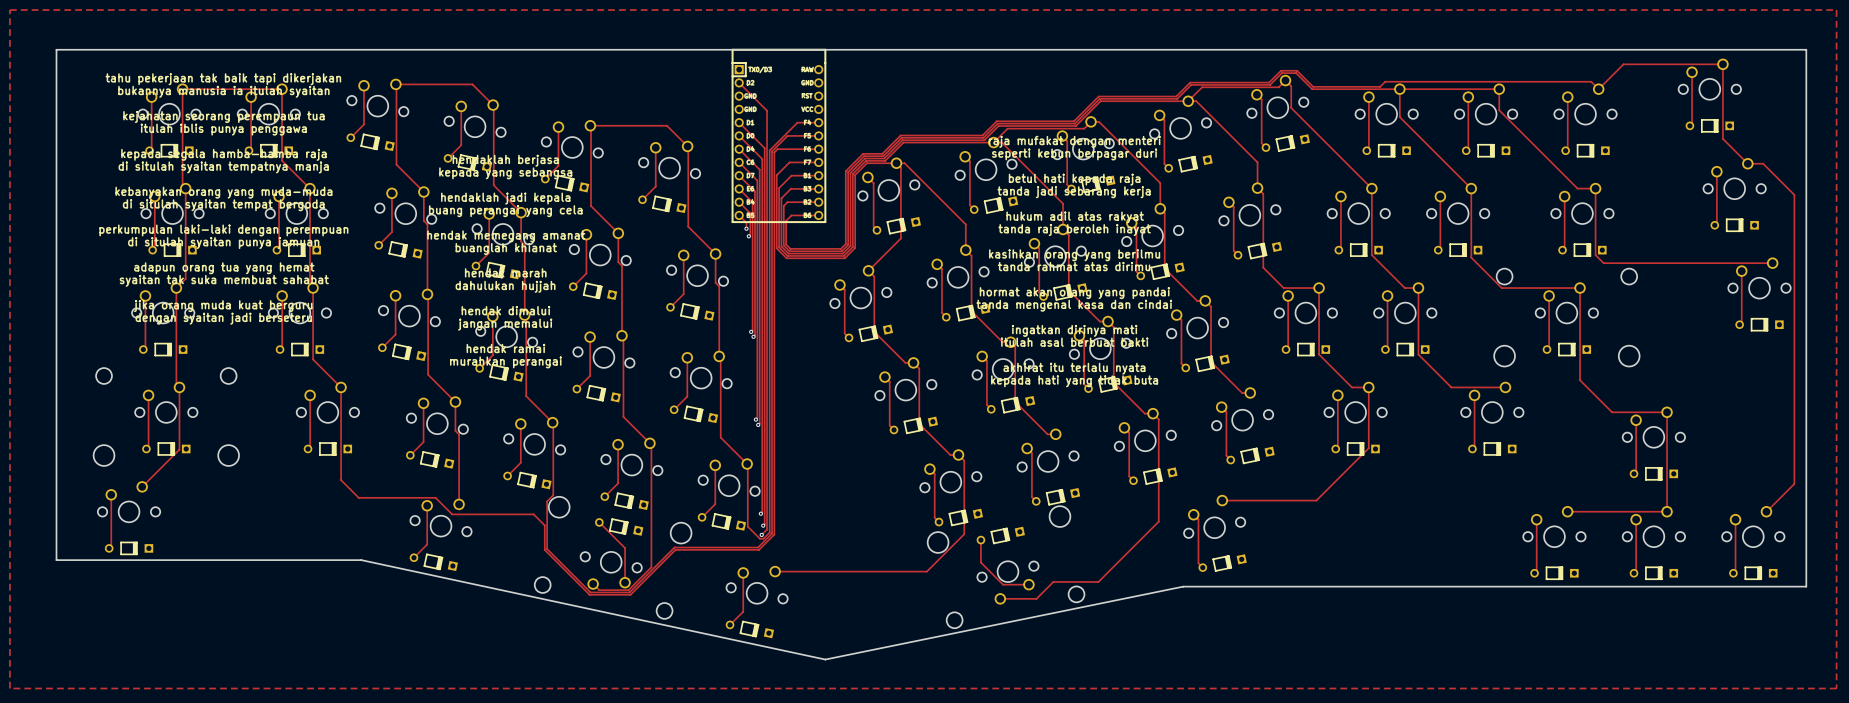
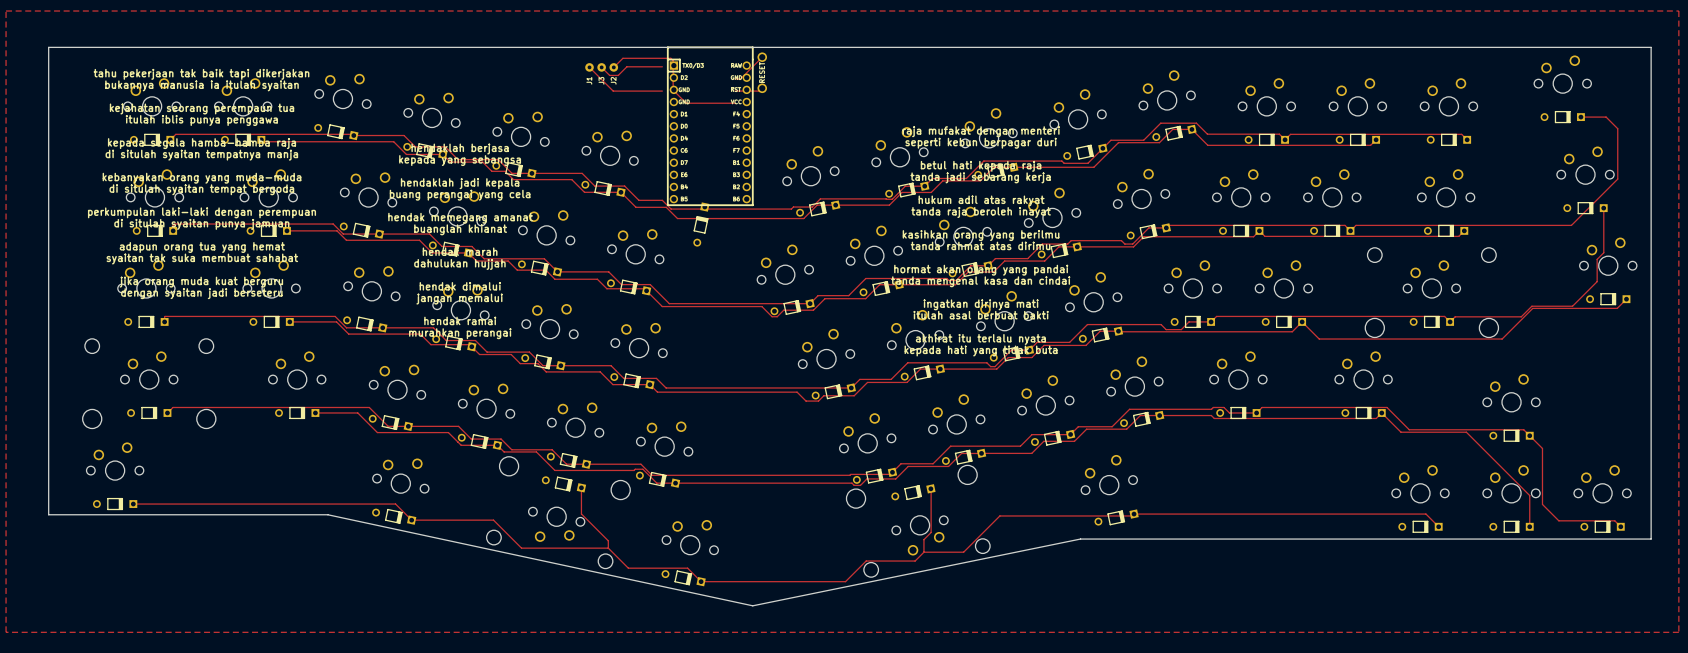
track: none -> (762, 57) (740, 78) (735, 78)
track: none -> (662, 66) (626, 66) (618, 75) (609, 75) (601, 67)
track: none -> (589, 67) (613, 91) (662, 91)
part: none -> (589, 67)
part: none -> (601, 67)
track: none -> (613, 67) (622, 58) (670, 58) (673, 60) (673, 90) (686, 103) (735, 103)
part: none -> (613, 67)
track: (1692, 72) (1692, 123) (1689, 125) -> none
part: none -> (762, 72)
track: (739, 82) (767, 110) (767, 529) (761, 535) -> none
track: (363, 85) (363, 124) (350, 137) -> none
track: (1399, 89) (1399, 117) (1471, 188) (1471, 257) (1501, 288) (1580, 288) (1580, 380) (1612, 412) (1667, 412) (1667, 511) (1567, 511) -> none
track: none -> (762, 88) (759, 91) (735, 91)
track: (1256, 94) (1261, 99) (1261, 143) (1265, 147) -> none
track: (151, 97) (151, 148) (149, 150) -> none
track: (251, 97) (251, 148) (248, 150) -> none
track: (1368, 97) (1368, 148) (1366, 150) -> none
track: (1468, 97) (1468, 148) (1466, 150) -> none
track: (1567, 97) (1567, 148) (1565, 150) -> none
track: (1188, 101) (1202, 87) (1278, 87) (1285, 80) (1291, 86) (1291, 107) (1371, 188) (1371, 255) (1404, 288) (1418, 288) (1418, 354) (1451, 387) (1505, 387) -> none
track: (461, 106) (461, 145) (448, 158) -> none
track: (1159, 115) (1164, 120) (1164, 163) (1168, 168) -> none
track: (739, 122) (764, 148) (763, 525) -> none
track: (818, 122) (797, 122) (769, 150) (769, 532) (763, 538) (759, 538) (747, 526) (747, 464) (720, 437) (719, 286) (715, 282) (715, 254) (688, 226) (688, 147) (666, 125) (590, 125) (590, 205) (618, 233) (618, 262) (621, 265) (623, 416) (651, 444) (651, 567) (628, 590) (599, 590) (593, 584) -> none
track: none -> (1580, 117) (1606, 117) (1617, 128) (1617, 179) (1571, 225) (1355, 225) (1350, 230) (1344, 225) (1168, 225) (1166, 227) (1148, 227) (1132, 244) (1124, 244) (1121, 240) (1071, 240) (1067, 244) (1042, 244) (1027, 258) (995, 258) (988, 265) (970, 265) (956, 280) (948, 280) (946, 278) (865, 278) (848, 295) (818, 295) (810, 303) (669, 303) (650, 284) (621, 284) (608, 271) (557, 271) (544, 258) (484, 258) (471, 246) (442, 246) (429, 234) (343, 234) (333, 224) (174, 224) (173, 230)
track: (558, 127) (558, 165) (545, 179) -> none
track: (739, 135) (762, 158) (760, 513) -> none
track: (818, 135) (787, 135) (772, 151) (772, 533) (758, 547) (674, 547) (629, 592) (590, 592) (547, 549) (547, 501) (553, 495) (553, 423) (526, 396) (524, 245) (521, 241) (521, 212) (493, 185) (493, 105) (472, 84) (395, 84) (396, 164) (423, 191) (423, 220) (427, 224) (428, 374) (455, 402) (455, 430) (459, 434) (459, 504) -> none
track: (1062, 136) (1067, 140) (1067, 184) (1071, 188) -> none
track: (993, 142) (1007, 128) (1084, 128) (1091, 121) (1099, 121) (1160, 183) (1160, 208) (1164, 213) (1164, 268) (1197, 300) (1205, 300) (1211, 306) (1211, 361) (1242, 392) (1250, 392) -> none
track: (655, 147) (655, 186) (642, 199) -> none
track: (739, 149) (759, 169) (758, 424) -> none
track: (818, 149) (777, 149) (774, 152) (774, 534) (759, 549) (675, 549) (630, 594) (589, 594) (544, 549) (544, 525) (533, 514) (452, 514) (435, 497) (358, 497) (341, 480) (341, 387) (313, 359) (313, 288) (309, 284) (309, 188) (282, 160) (282, 89) (182, 89) (182, 185) (185, 188) (185, 278) (176, 288) (176, 384) (179, 387) (179, 449) (142, 486) -> none
track: none -> (170, 139) (175, 134) (404, 135) (415, 146) (445, 146) (458, 159) (498, 159) (512, 173) (582, 173) (594, 186) (624, 186) (638, 200) (662, 200) (671, 209) (702, 209) (704, 207) (706, 209) (791, 209) (793, 207) (812, 207) (820, 198) (892, 199) (905, 186) (924, 186) (932, 178) (966, 178) (983, 161) (1061, 161) (1064, 163) (1087, 163) (1110, 140) (1143, 140) (1160, 123) (1196, 123) (1207, 134) (1279, 134) (1285, 139) (1290, 134) (1461, 134) (1467, 139)
track: none -> (261, 139) (263, 141) (393, 141) (406, 154) (442, 154) (450, 162) (482, 162) (491, 171) (505, 171) (513, 179) (571, 179) (584, 192) (620, 192) (636, 207) (666, 207) (677, 218) (803, 218) (817, 205) (889, 205) (902, 192) (931, 192) (942, 180) (980, 180) (993, 167) (1093, 167) (1118, 142) (1159, 142) (1172, 129) (1191, 129) (1207, 145) (1370, 145) (1376, 139)
track: (965, 156) (969, 161) (969, 205) (974, 209) -> none
track: (739, 162) (757, 180) (755, 419) -> none
track: (818, 162) (789, 162) (776, 175) (776, 248) (786, 258) (844, 258) (855, 247) (855, 175) (866, 163) (904, 163) (965, 224) (965, 250) (971, 255) (971, 311) (1002, 342) (1010, 342) (1015, 346) (1015, 401) (1047, 434) (1055, 434) -> none
track: (896, 163) (900, 167) (900, 238) (868, 270) (874, 276) (874, 331) (905, 362) (913, 362) (919, 368) (919, 423) (950, 454) (958, 454) (964, 460) (964, 534) (926, 571) (775, 571) -> none
track: (1716, 171) (1716, 223) (1714, 225) -> none
track: (739, 175) (754, 191) (753, 336) -> none
track: (818, 175) (791, 175) (779, 188) (779, 247) (787, 255) (843, 255) (852, 246) (852, 174) (866, 160) (885, 160) (903, 142) (1001, 142) (1063, 203) (1063, 229) (1068, 235) (1068, 290) (1099, 321) (1108, 321) (1113, 327) (1113, 382) (1144, 413) (1153, 413) (1158, 419) (1158, 521) (1098, 581) (1053, 581) (1036, 598) (1000, 598) -> none
track: (867, 177) (873, 183) (873, 226) (876, 230) -> none
track: (739, 188) (752, 202) (751, 331) -> none
track: (818, 188) (790, 188) (781, 198) (781, 246) (788, 253) (842, 253) (850, 246) (850, 173) (865, 158) (884, 158) (902, 140) (984, 140) (998, 125) (1075, 125) (1100, 101) (1196, 101) (1257, 162) (1257, 188) (1263, 193) (1263, 267) (1283, 288) (1319, 288) (1319, 354) (1352, 387) (1368, 387) (1368, 448) (1316, 500) (1222, 500) -> none
track: (391, 193) (391, 232) (378, 245) -> none
track: (154, 196) (154, 248) (152, 250) -> none
track: (279, 196) (279, 248) (276, 250) -> none
track: (1340, 196) (1340, 248) (1338, 250) -> none
track: (1440, 196) (1440, 248) (1438, 250) -> none
track: (1564, 196) (1564, 248) (1562, 250) -> none
track: (739, 202) (750, 213) (748, 236) -> none
track: (818, 202) (787, 202) (783, 206) (783, 245) (789, 251) (841, 251) (848, 245) (848, 172) (864, 156) (883, 156) (901, 137) (983, 137) (997, 123) (1074, 123) (1099, 98) (1177, 98) (1191, 84) (1270, 84) (1281, 73) (1296, 73) (1312, 89) (1499, 89) (1499, 110) (1577, 188) (1595, 188) (1595, 255) (1603, 263) (1772, 263) -> none
track: (1228, 202) (1233, 207) (1233, 250) (1238, 255) -> none
track: (489, 213) (489, 252) (475, 265) -> none
track: (739, 215) (746, 222) (746, 228) -> none
track: (818, 215) (791, 215) (786, 220) (786, 244) (790, 248) (840, 248) (845, 244) (845, 171) (863, 153) (882, 153) (900, 135) (982, 135) (996, 121) (1073, 121) (1098, 96) (1176, 96) (1190, 82) (1269, 82) (1280, 70) (1297, 70) (1313, 86) (1380, 86) (1385, 81) (1591, 81) (1598, 89) (1623, 64) (1722, 64) (1722, 138) (1747, 163) (1763, 163) (1794, 194) (1794, 483) (1766, 511) -> none
track: (1131, 223) (1136, 227) (1136, 271) (1140, 275) -> none
track: none -> (1603, 208) (1603, 252) (1597, 259) (1597, 281) (1572, 306) (1531, 306) (1521, 316) (1455, 316) (1450, 321) (1444, 316) (1216, 316) (1211, 321) (1189, 321) (1181, 329) (1166, 329) (1161, 324) (1087, 324) (1069, 342) (1037, 342) (1029, 350) (1011, 350) (994, 366) (990, 366) (986, 362) (907, 362) (891, 379) (859, 379) (851, 387) (666, 387) (656, 378) (623, 378) (611, 365) (543, 365) (529, 352) (487, 352) (475, 340) (446, 340) (433, 327) (346, 327) (335, 316) (164, 316) (164, 321)
via: (746, 228) -> none
track: (586, 234) (586, 273) (573, 286) -> none
via: (748, 236) -> none
part: none -> (701, 224)
track: (1034, 243) (1039, 248) (1039, 292) (1043, 296) -> none
track: none -> (286, 230) (337, 230) (346, 240) (419, 240) (432, 252) (468, 252) (476, 261) (508, 261) (517, 270) (545, 270) (554, 279) (597, 279) (606, 288) (644, 288) (662, 306) (761, 306) (772, 316) (777, 316) (783, 310) (813, 310) (824, 298) (865, 298) (879, 284) (955, 284) (968, 272) (993, 272) (1004, 261) (1044, 261) (1058, 246) (1133, 246) (1143, 236) (1253, 236) (1259, 230) (1264, 236) (1458, 236) (1464, 230)
track: (683, 255) (683, 294) (670, 307) -> none
track: (937, 264) (941, 269) (941, 312) (946, 317) -> none
track: (1741, 271) (1741, 322) (1739, 324) -> none
track: (839, 285) (844, 289) (844, 333) (849, 337) -> none
track: (145, 295) (145, 347) (143, 349) -> none
track: (282, 295) (282, 347) (280, 349) -> none
track: (395, 295) (395, 334) (382, 347) -> none
track: (1288, 295) (1288, 347) (1286, 349) -> none
track: (1387, 295) (1387, 347) (1385, 349) -> none
track: (1549, 295) (1549, 347) (1547, 349) -> none
track: (1176, 315) (1181, 319) (1181, 363) (1185, 367) -> none
track: (492, 316) (492, 355) (479, 368) -> none
track: none -> (1626, 299) (1617, 308) (1532, 308) (1502, 339) (1319, 339) (1302, 321) (1292, 331) (1100, 331) (1086, 345) (1044, 345) (1031, 357) (1008, 357) (996, 369) (920, 369) (907, 382) (867, 382) (854, 395) (823, 395) (818, 401) (806, 401) (797, 392) (657, 392) (649, 384) (612, 384) (600, 371) (546, 371) (537, 363) (520, 363) (511, 354) (479, 354) (469, 344) (430, 344) (420, 334) (348, 334) (336, 321) (289, 321)
via: (751, 331) -> none
track: (1079, 335) (1084, 340) (1084, 384) (1088, 388) -> none
via: (753, 336) -> none
track: (590, 337) (590, 375) (576, 389) -> none
track: (982, 356) (986, 361) (986, 404) (991, 409) -> none
track: (687, 357) (687, 396) (674, 409) -> none
track: (884, 377) (889, 381) (889, 425) (894, 429) -> none
track: (148, 395) (148, 446) (146, 448) -> none
track: (310, 395) (310, 446) (308, 448) -> none
track: (1337, 395) (1337, 446) (1335, 448) -> none
track: (1474, 395) (1474, 446) (1472, 448) -> none
track: (423, 403) (423, 442) (410, 455) -> none
track: (1221, 407) (1226, 411) (1226, 455) (1230, 460) -> none
via: (755, 419) -> none
track: (1636, 420) (1636, 471) (1633, 473) -> none
track: (520, 424) (520, 462) (507, 475) -> none
via: (758, 424) -> none
track: (1124, 427) (1129, 432) (1129, 476) (1133, 480) -> none
track: (618, 444) (618, 483) (604, 496) -> none
track: none -> (167, 412) (172, 407) (369, 407) (388, 426) (458, 426) (471, 439) (501, 439) (511, 449) (552, 449) (566, 464) (640, 464) (652, 475) (849, 475) (890, 474) (901, 463) (933, 463) (950, 446) (1020, 446) (1032, 434) (1070, 434) (1078, 426) (1112, 426) (1129, 409) (1211, 409) (1213, 407) (1223, 407) (1229, 412) (1256, 412) (1262, 407) (1386, 407) (1409, 429) (1523, 429) (1542, 448) (1542, 504) (1558, 520) (1614, 520) (1620, 526)
track: none -> (315, 412) (357, 412) (377, 432) (448, 432) (457, 441)
track: (1027, 448) (1031, 453) (1031, 497) (1036, 501) -> none
track: (715, 465) (715, 504) (702, 517) -> none
track: (929, 469) (934, 473) (934, 517) (938, 522) -> none
track: none -> (457, 441) (461, 445) (497, 445) (504, 451) (536, 451) (554, 470) (642, 469) (656, 483) (851, 483) (854, 485) (860, 485) (866, 478) (895, 478) (908, 466) (948, 466) (961, 453) (1031, 453) (1043, 441) (1074, 441) (1086, 429) (1126, 429) (1140, 415) (1211, 415) (1214, 418) (1376, 418) (1381, 412) (1401, 432) (1466, 432) (1529, 495) (1529, 526)
track: (111, 494) (111, 546) (109, 548) -> none
track: (427, 505) (427, 544) (413, 557) -> none
via: (760, 513) -> none
track: (1193, 514) (1198, 519) (1198, 563) (1202, 567) -> none
track: (1536, 519) (1536, 571) (1534, 573) -> none
track: (1636, 519) (1636, 571) (1633, 573) -> none
track: (1735, 519) (1735, 571) (1733, 573) -> none
track: (599, 522) (625, 548) (625, 582) -> none
via: (763, 525) -> none
track: none -> (581, 487) (581, 513) (608, 540) (608, 548)
track: none -> (930, 488) (931, 532) (923, 539) (923, 552)
via: (761, 534) -> none
track: (980, 540) (980, 562) (1003, 584) (1028, 584) -> none
track: none -> (133, 504) (395, 504) (411, 520) (493, 520) (521, 548) (608, 548)
track: (743, 572) (743, 611) (730, 624) -> none
track: none -> (1438, 526) (1425, 514) (999, 515) (963, 552) (923, 552)
track: none -> (608, 548) (628, 568) (687, 568) (701, 581) (845, 581) (866, 561) (915, 561) (923, 552)

